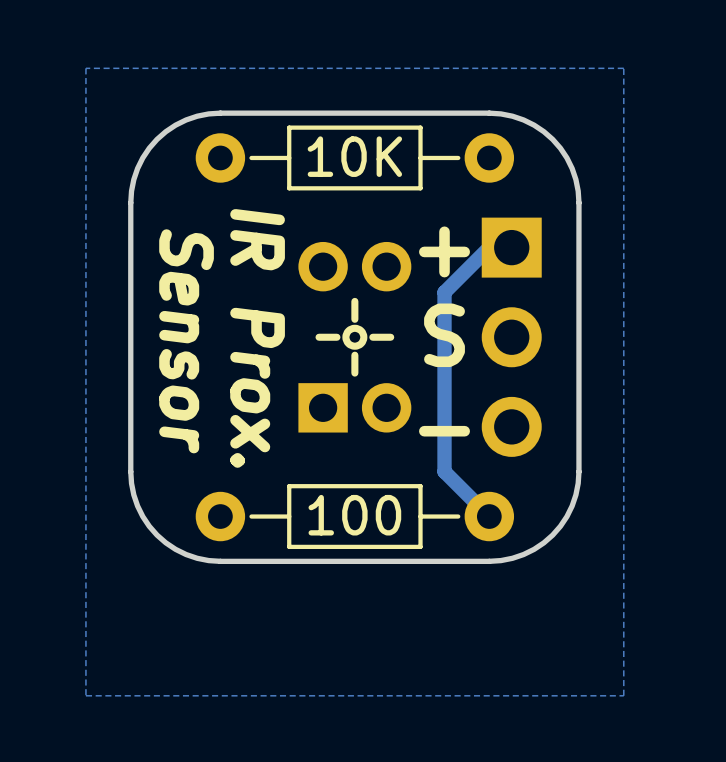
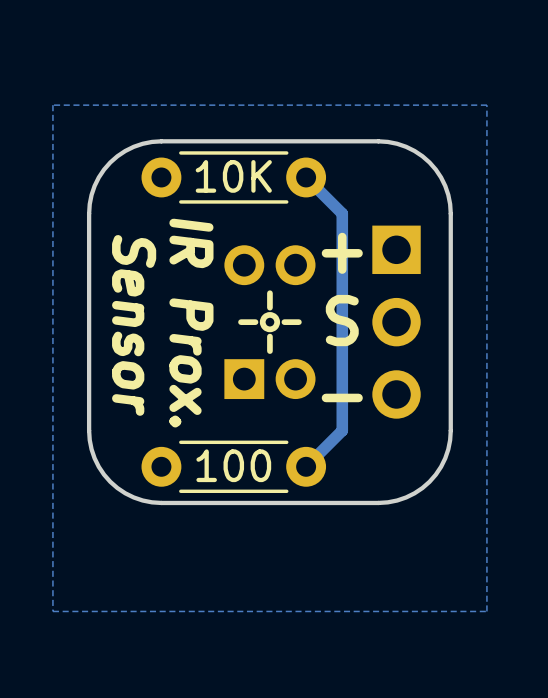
part: none -> 10K (233, 177)
part: 10K (354, 157) -> none
track: (511, 247) (489, 247) (444, 292) -> (306, 177) (342, 213) (342, 285)
track: (444, 471) (489, 516) -> (342, 430) (306, 466)
part: none -> 100 (233, 466)
part: 100 (354, 516) -> none

